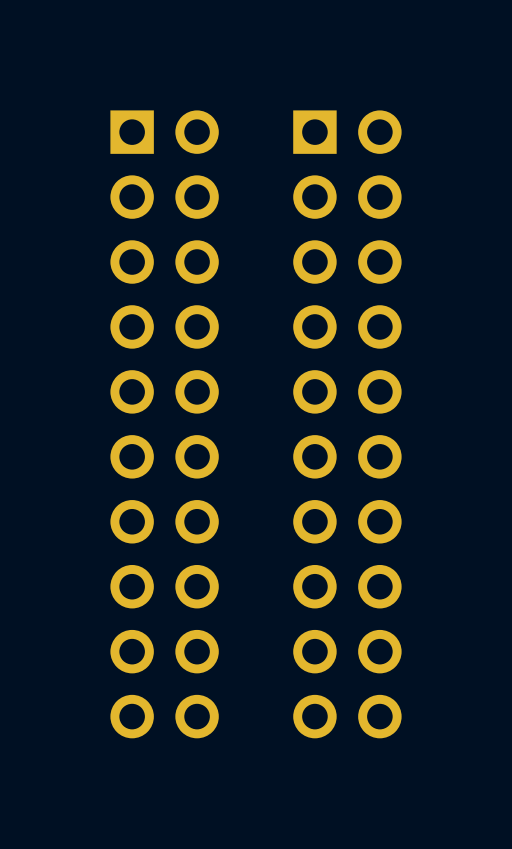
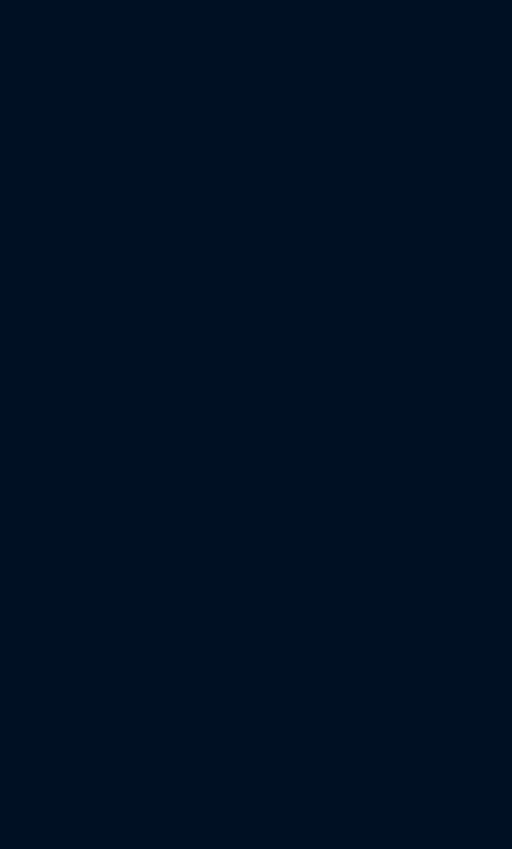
part: (164, 424) -> none
part: (347, 424) -> none

